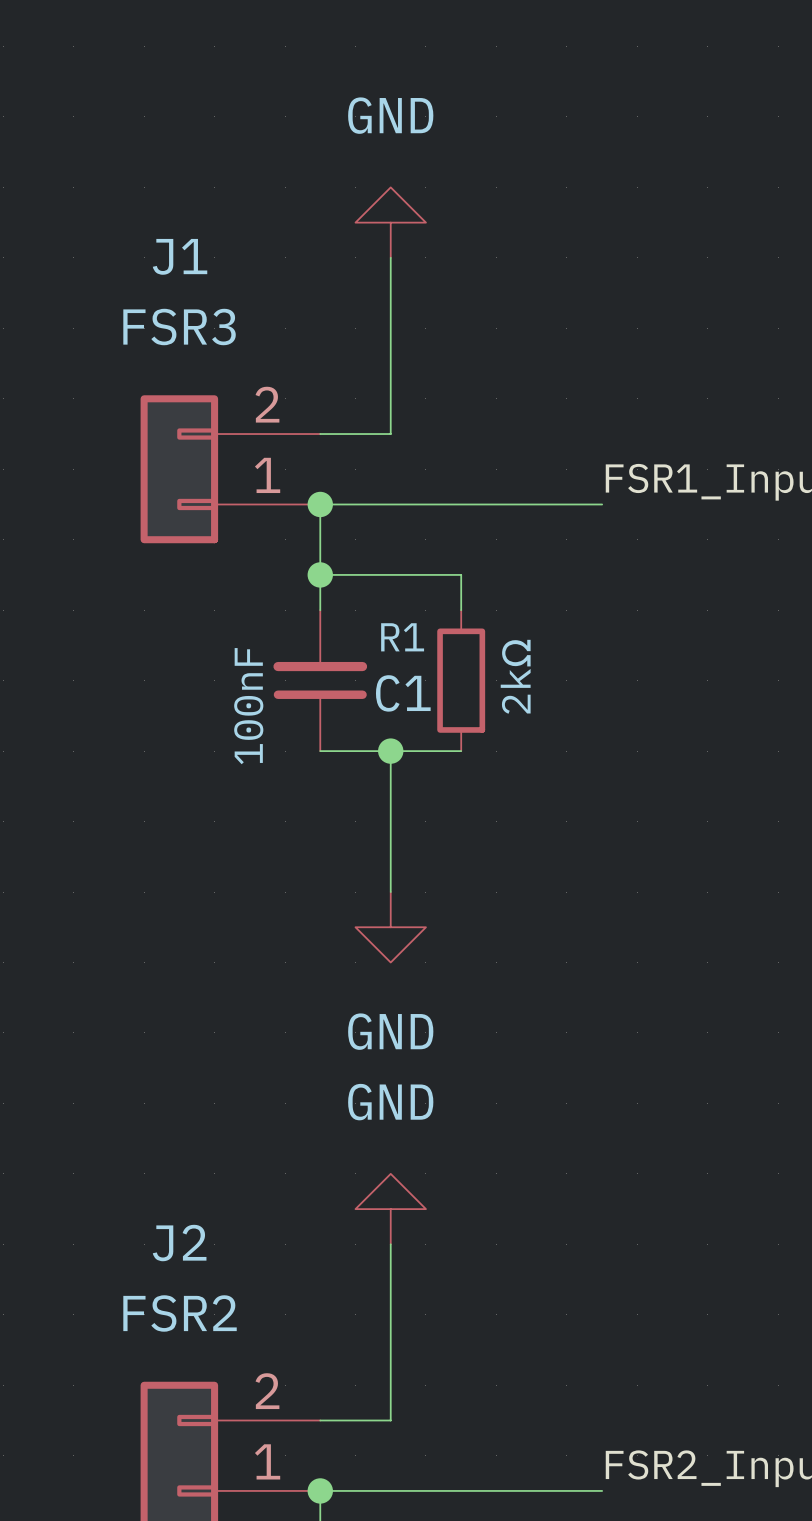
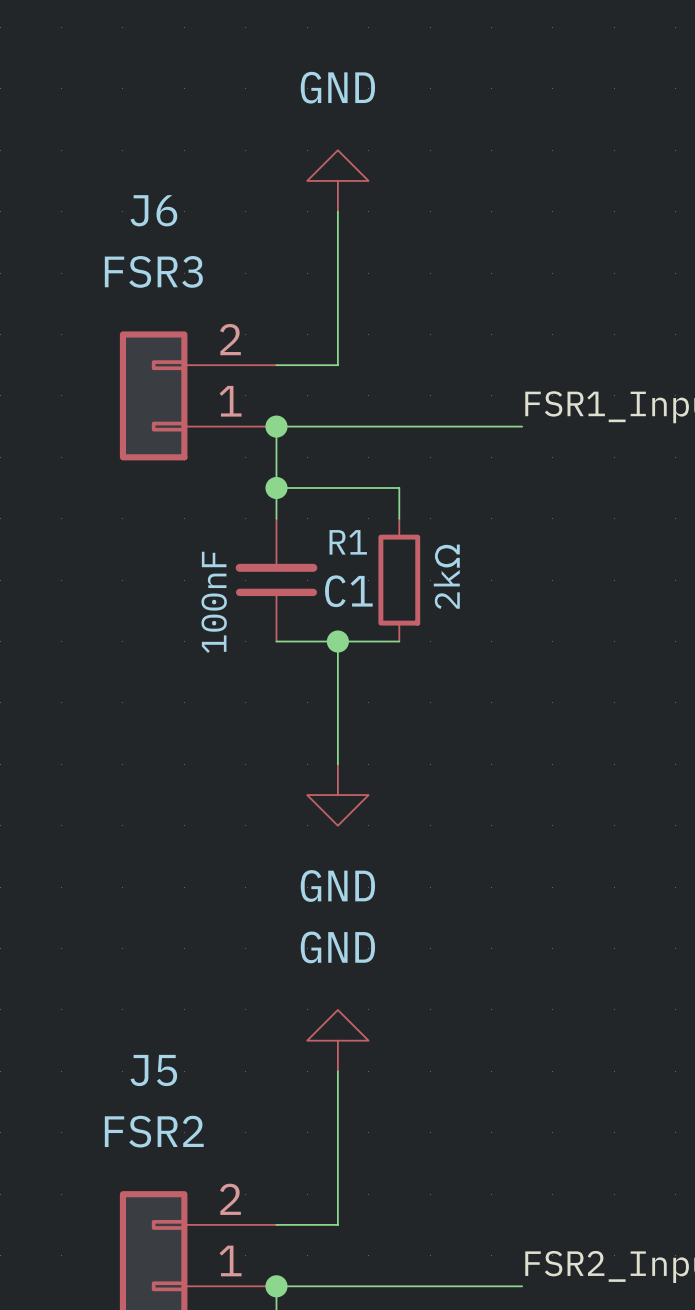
J1 name: J1 (180, 256) -> J6 (153, 210)
J2 name: J2 (179, 1243) -> J5 (153, 1070)

